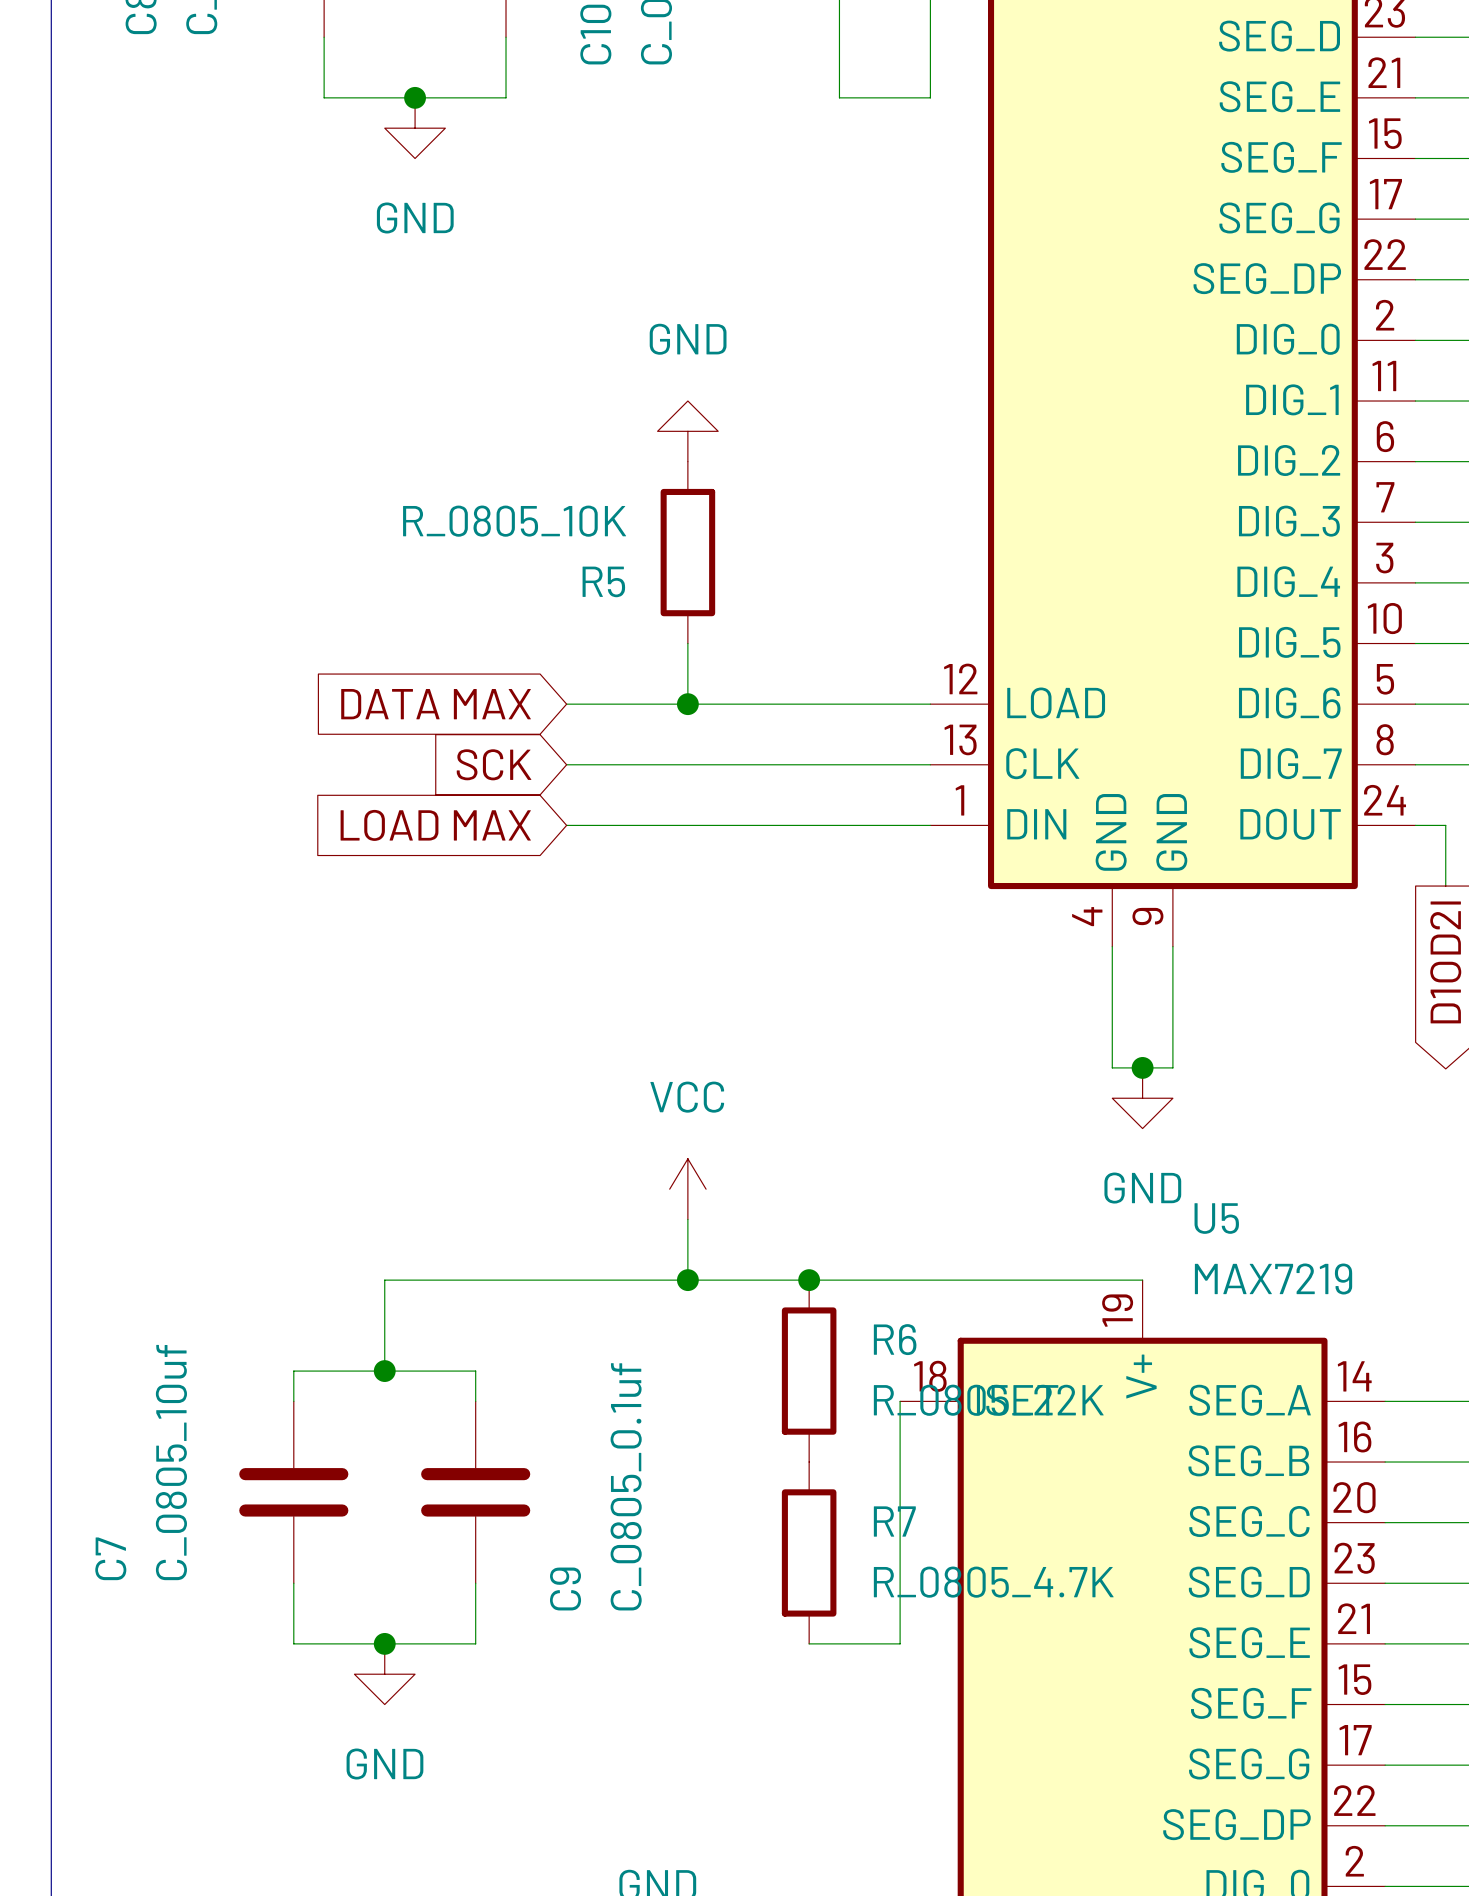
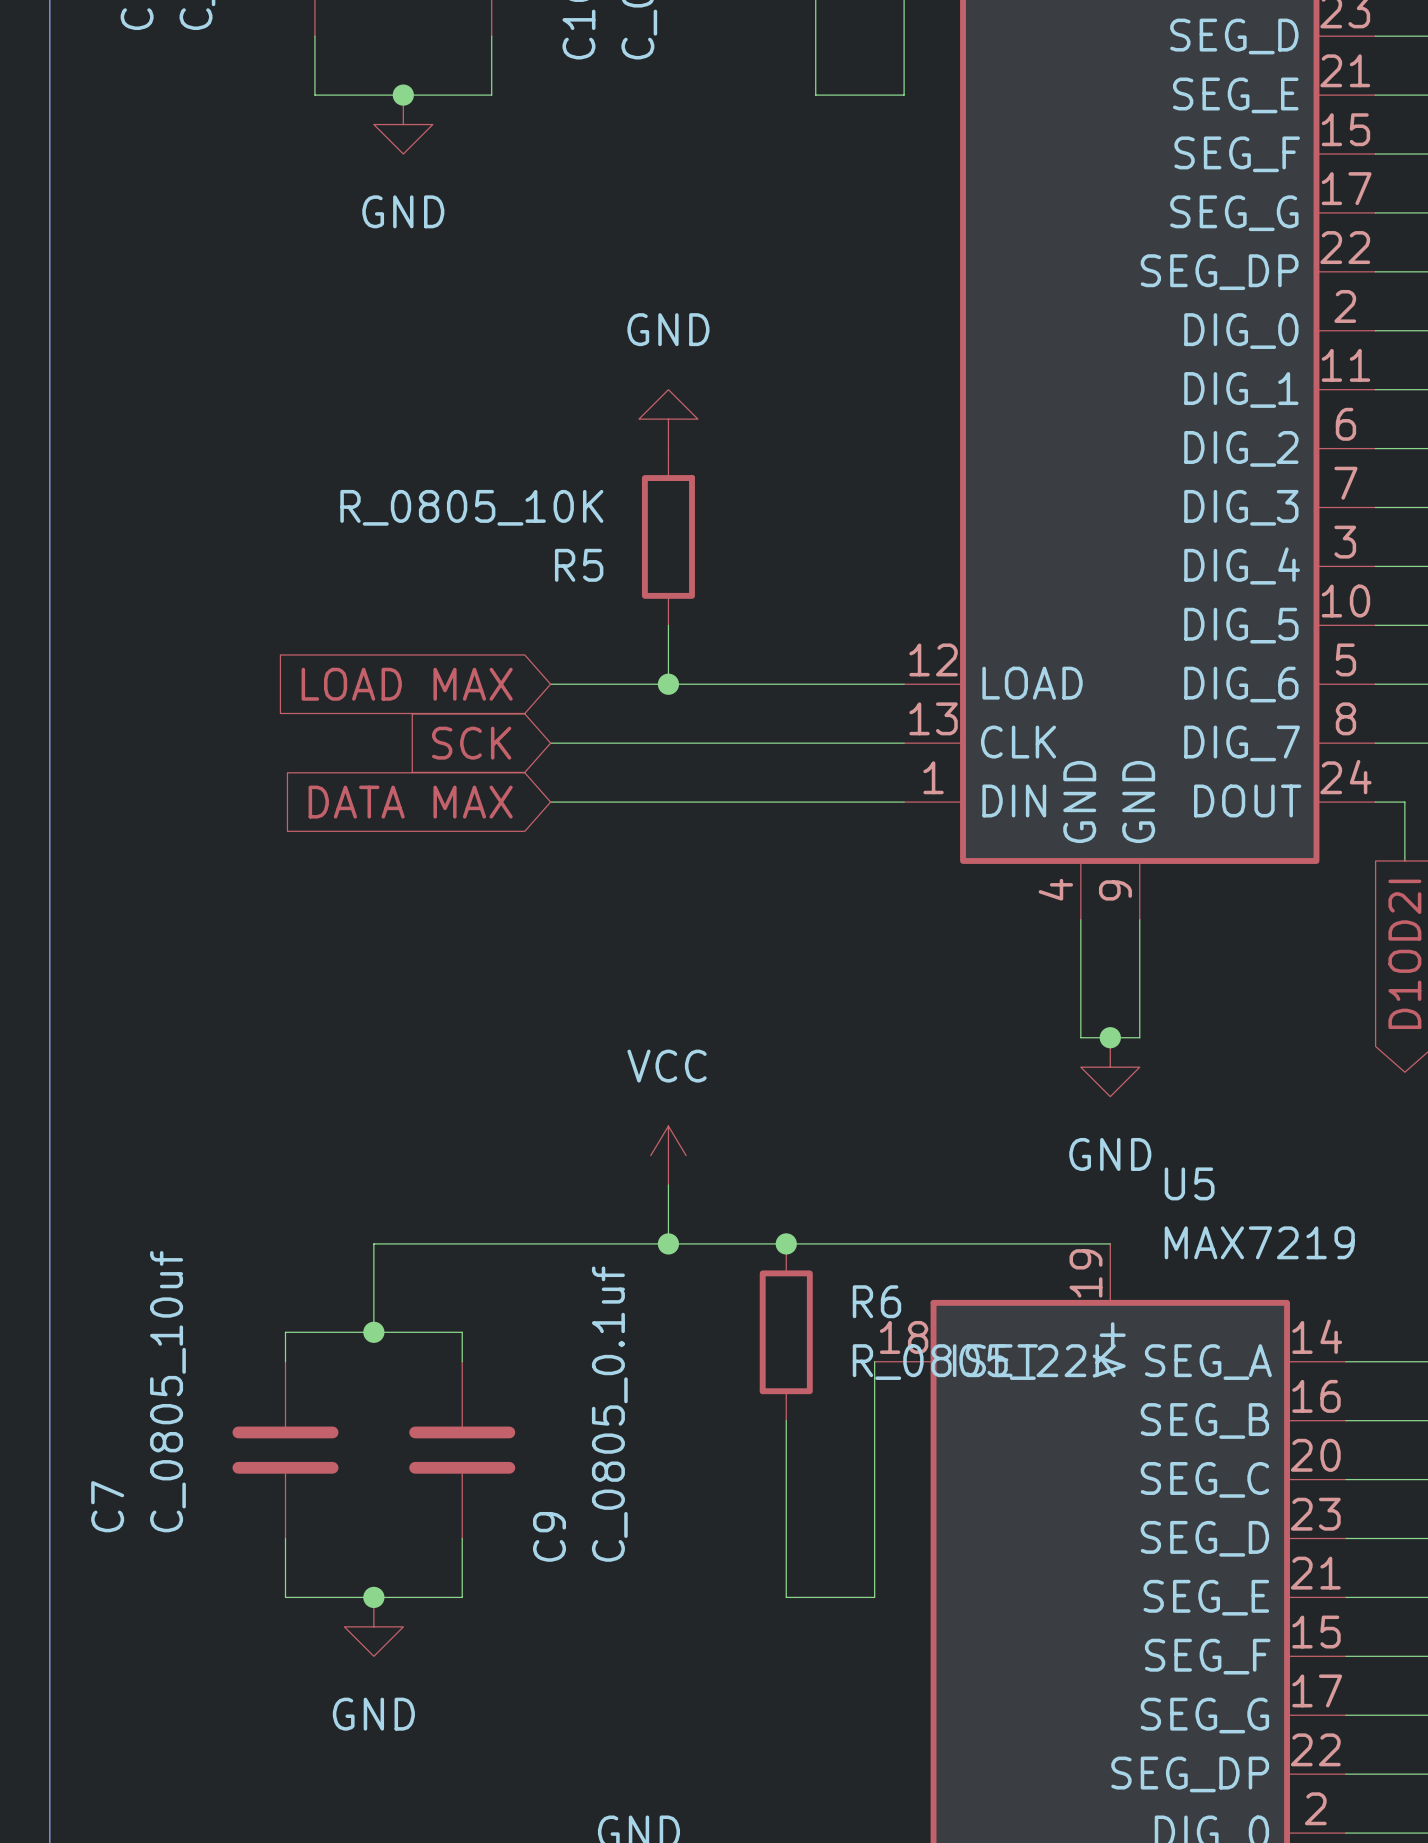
global label: DATA MAX (436, 704) -> LOAD MAX (407, 684)
global label: LOAD MAX (435, 825) -> DATA MAX (410, 802)
wire: none -> (786, 1420) (786, 1597)
R7: R_0805_4.7K (809, 1552) -> none

